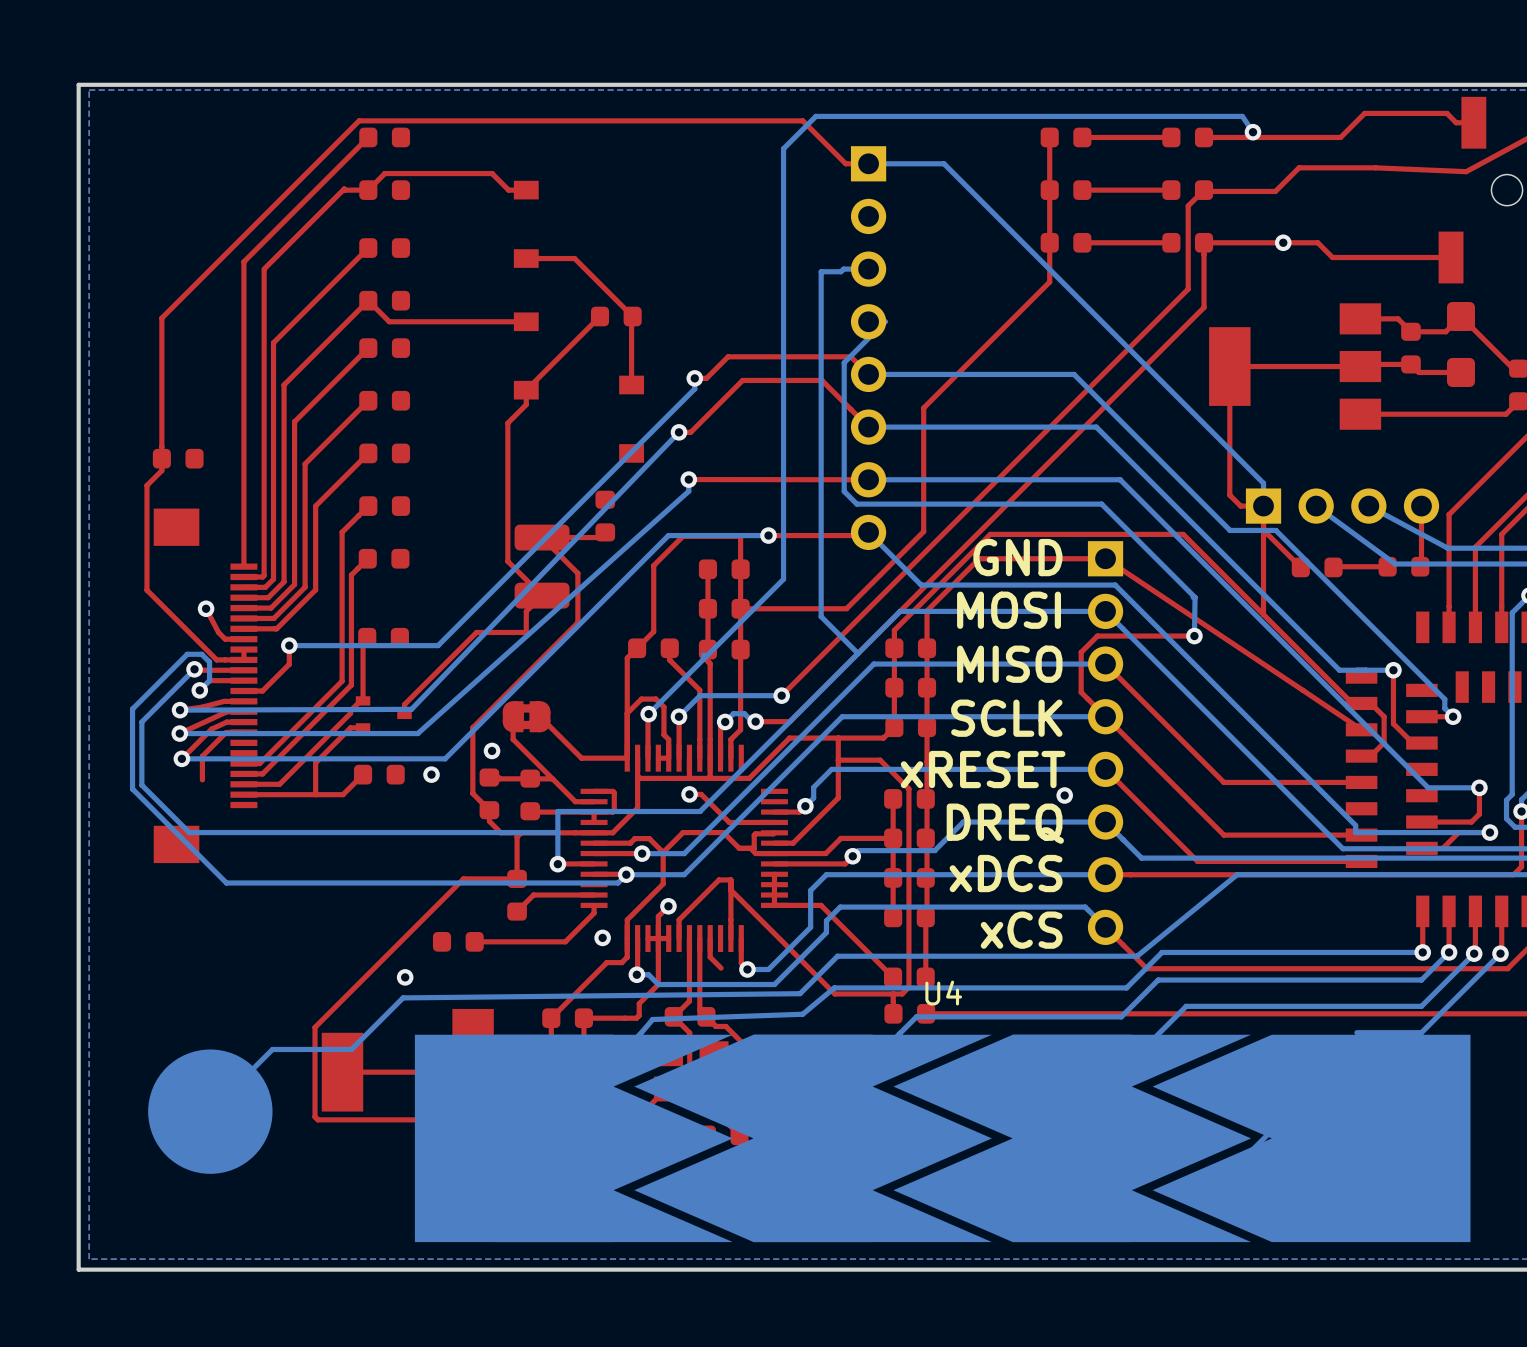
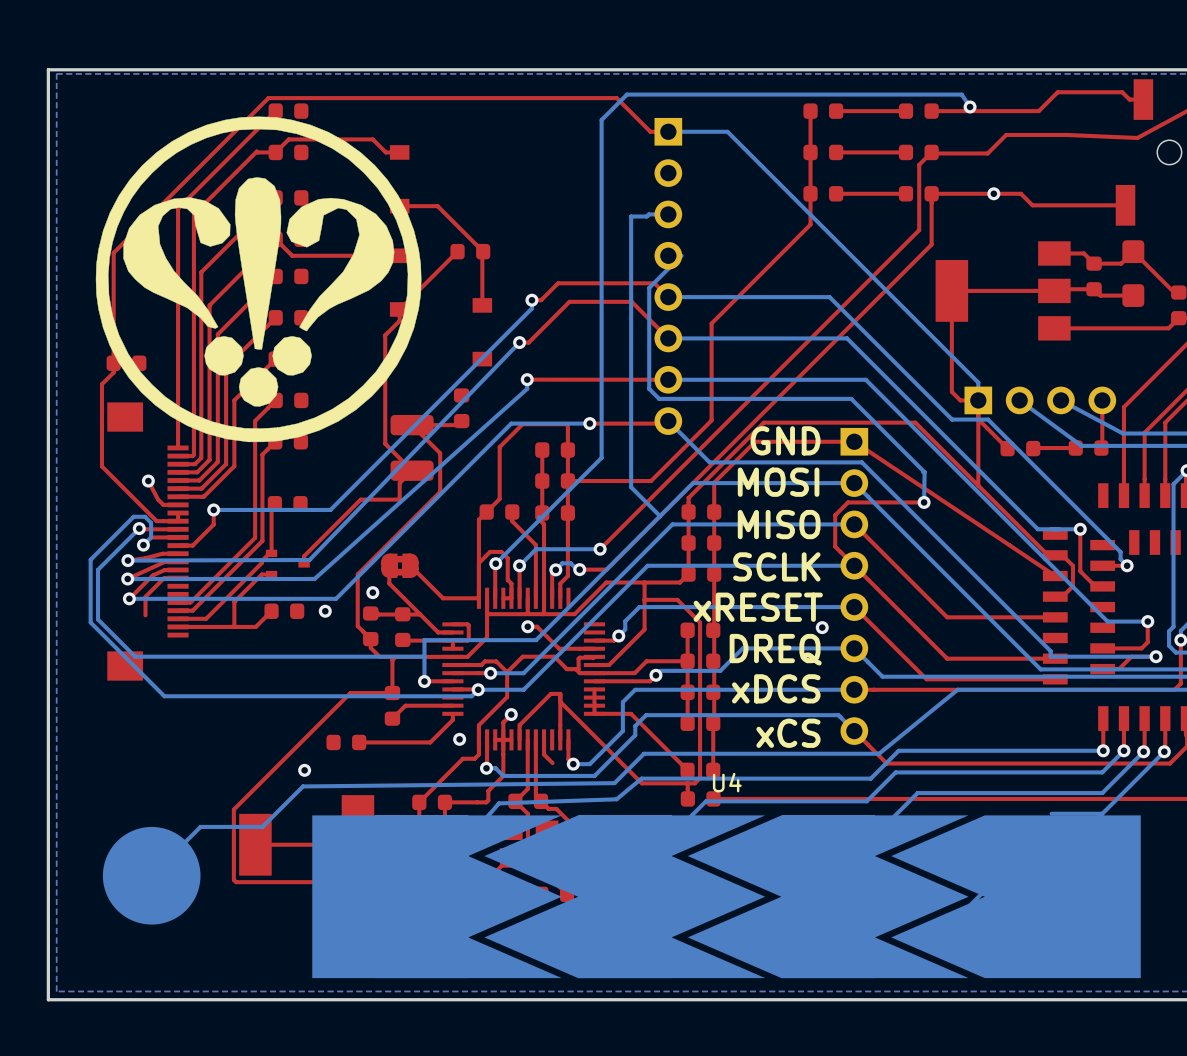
drawing: none -> [95, 116, 422, 443]

